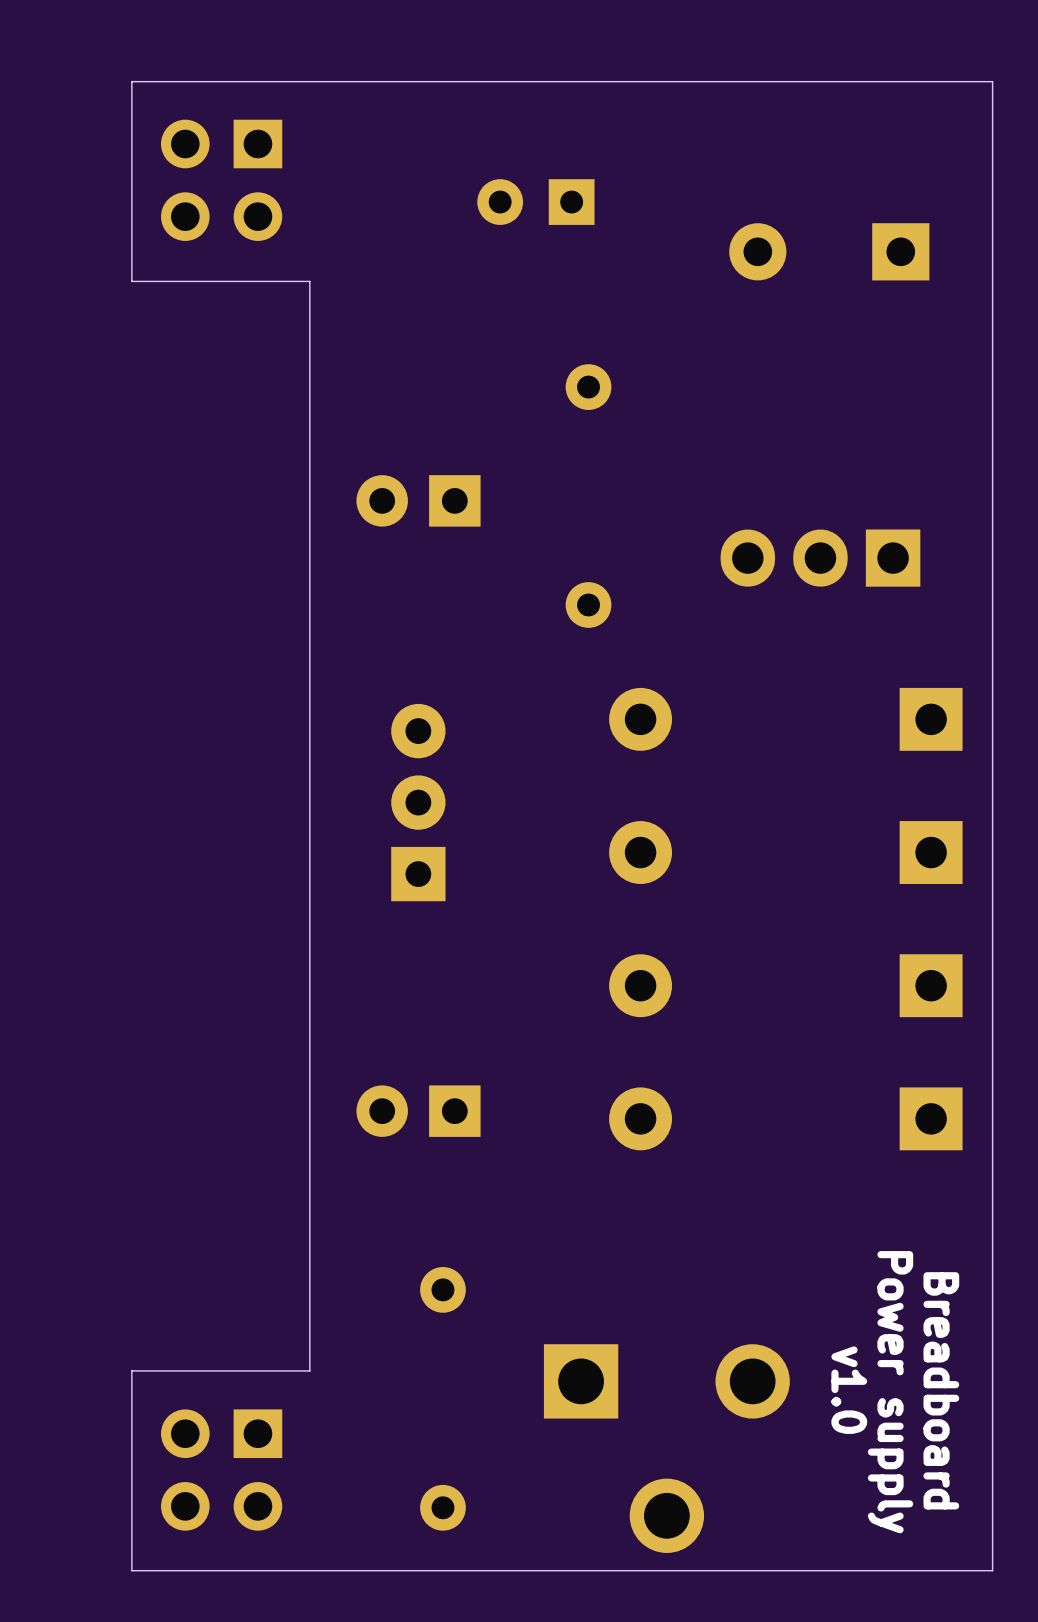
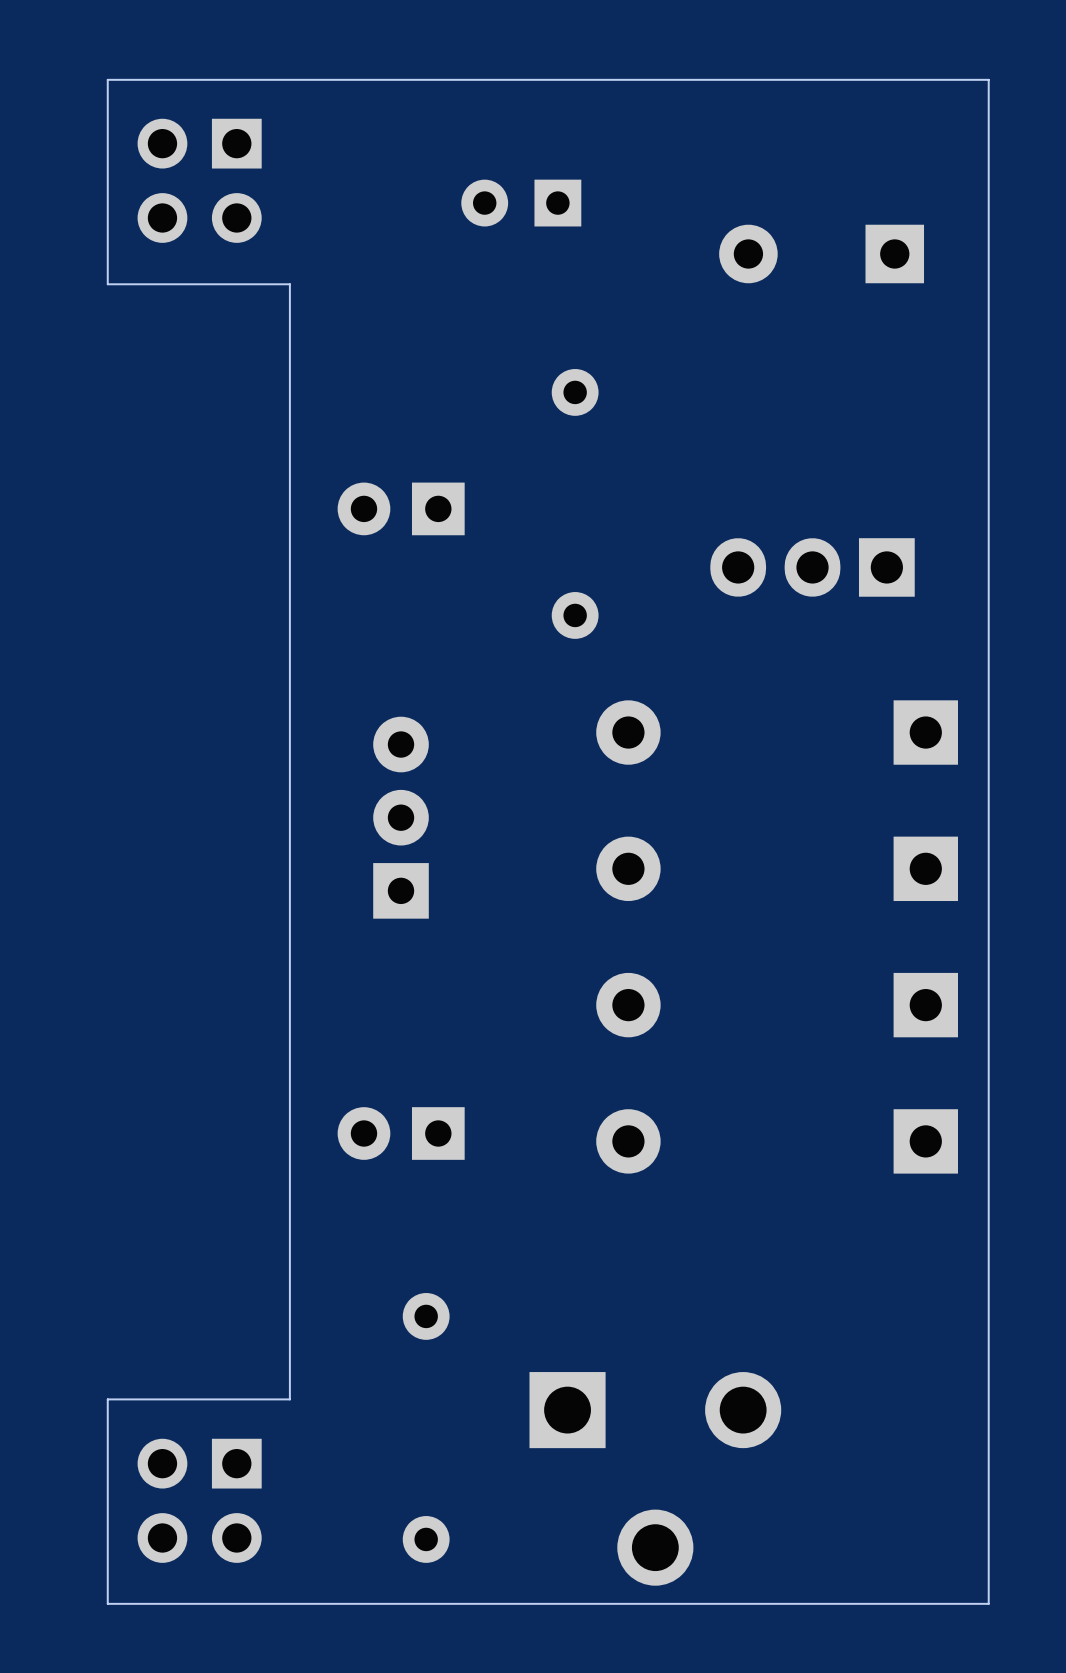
text: v1.0 (849, 1390) -> none
text: Breadboard (941, 1390) -> none
text: Power supply (890, 1392) -> none

